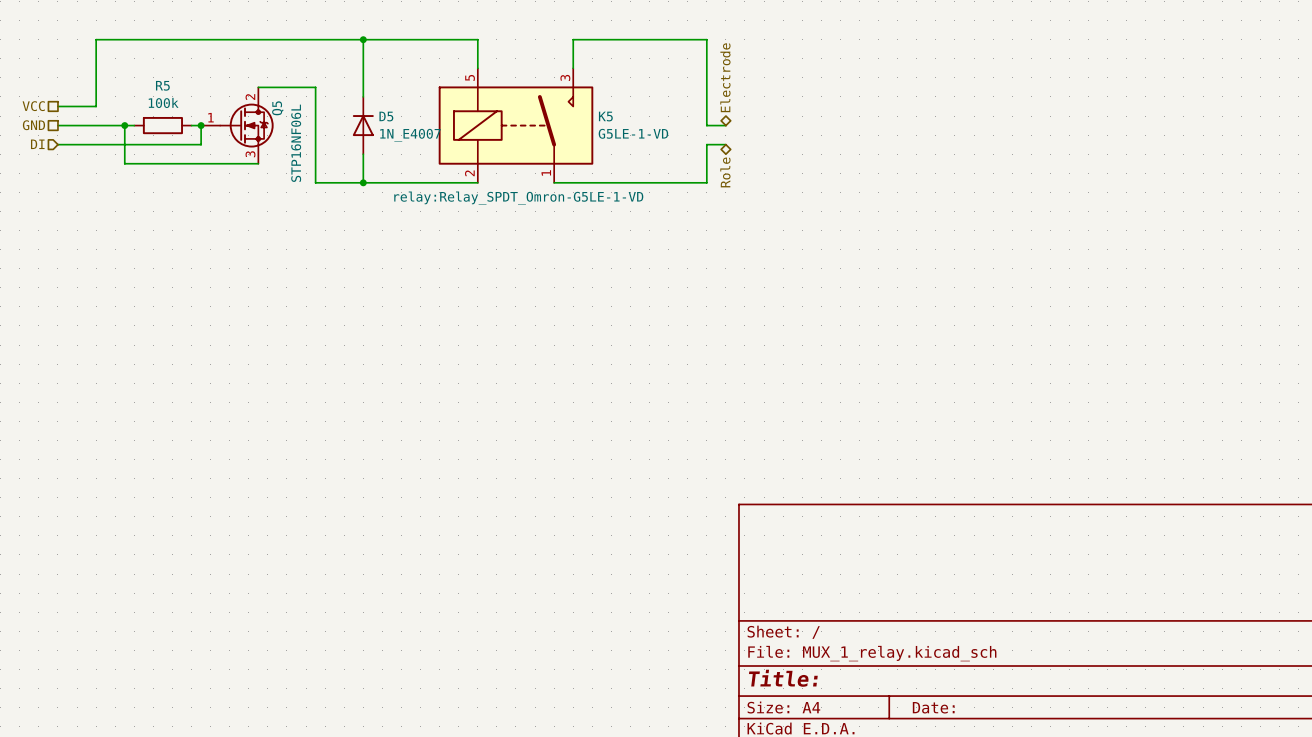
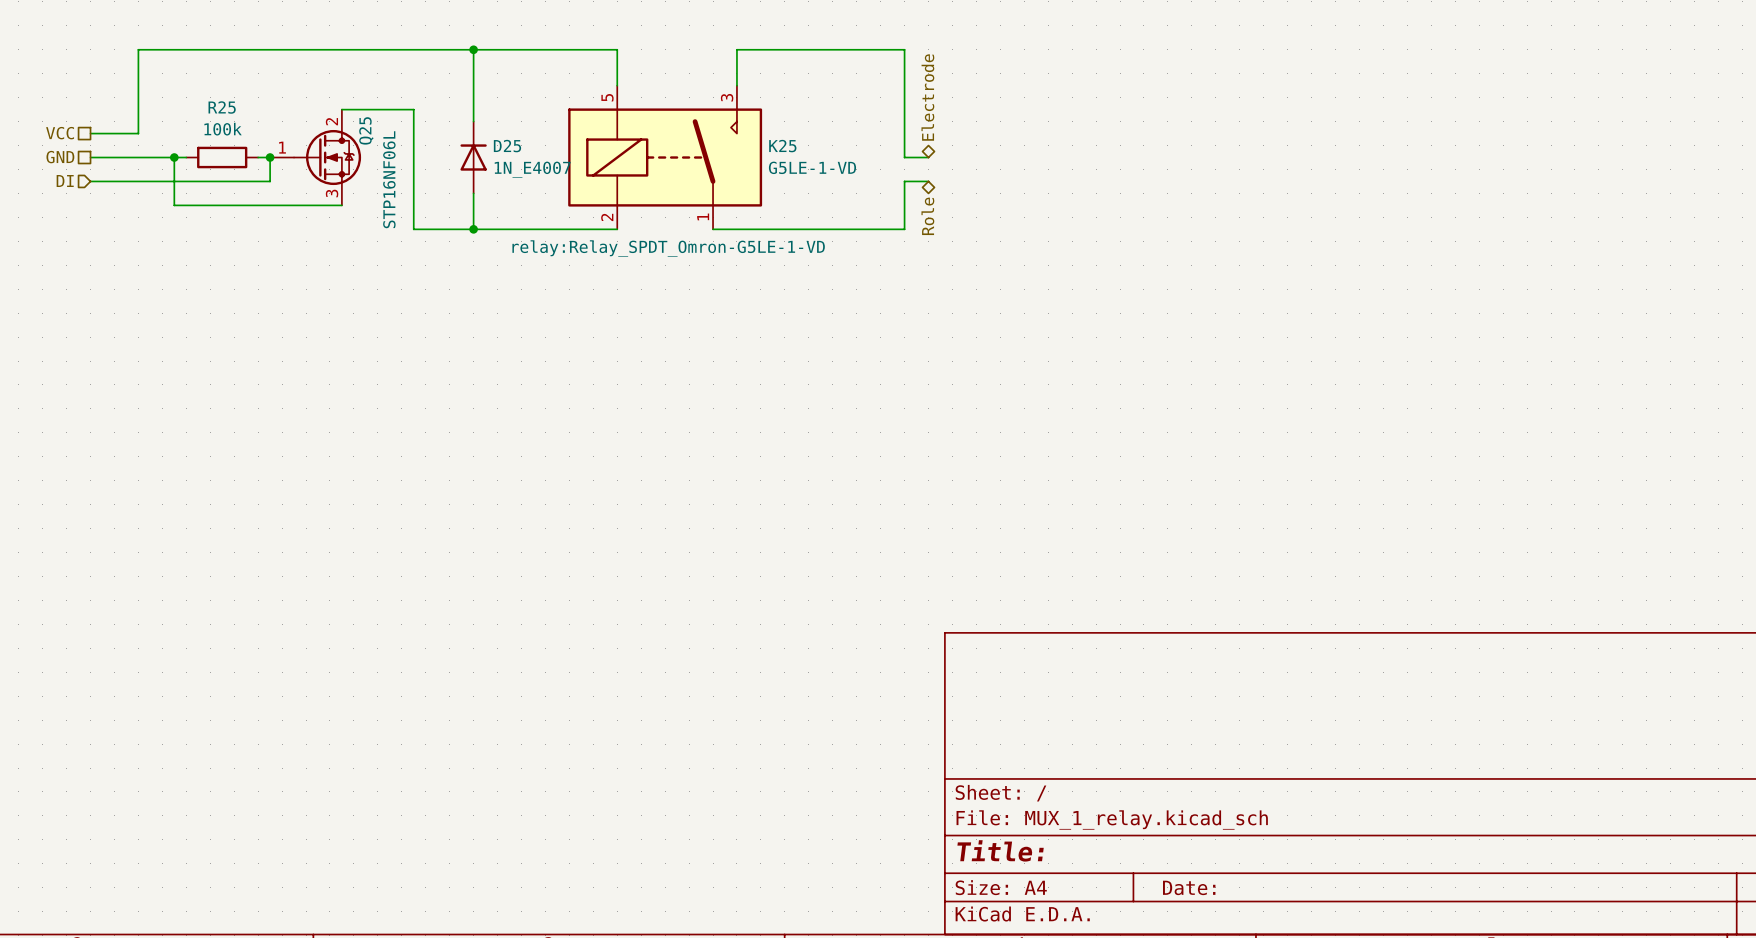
R5 name: R5 (162, 85) -> R25 (222, 107)
Q5 name: Q5 (277, 108) -> Q25 (366, 130)
D5 name: D5 (386, 116) -> D25 (507, 146)
K5 name: K5 (605, 116) -> K25 (782, 146)

